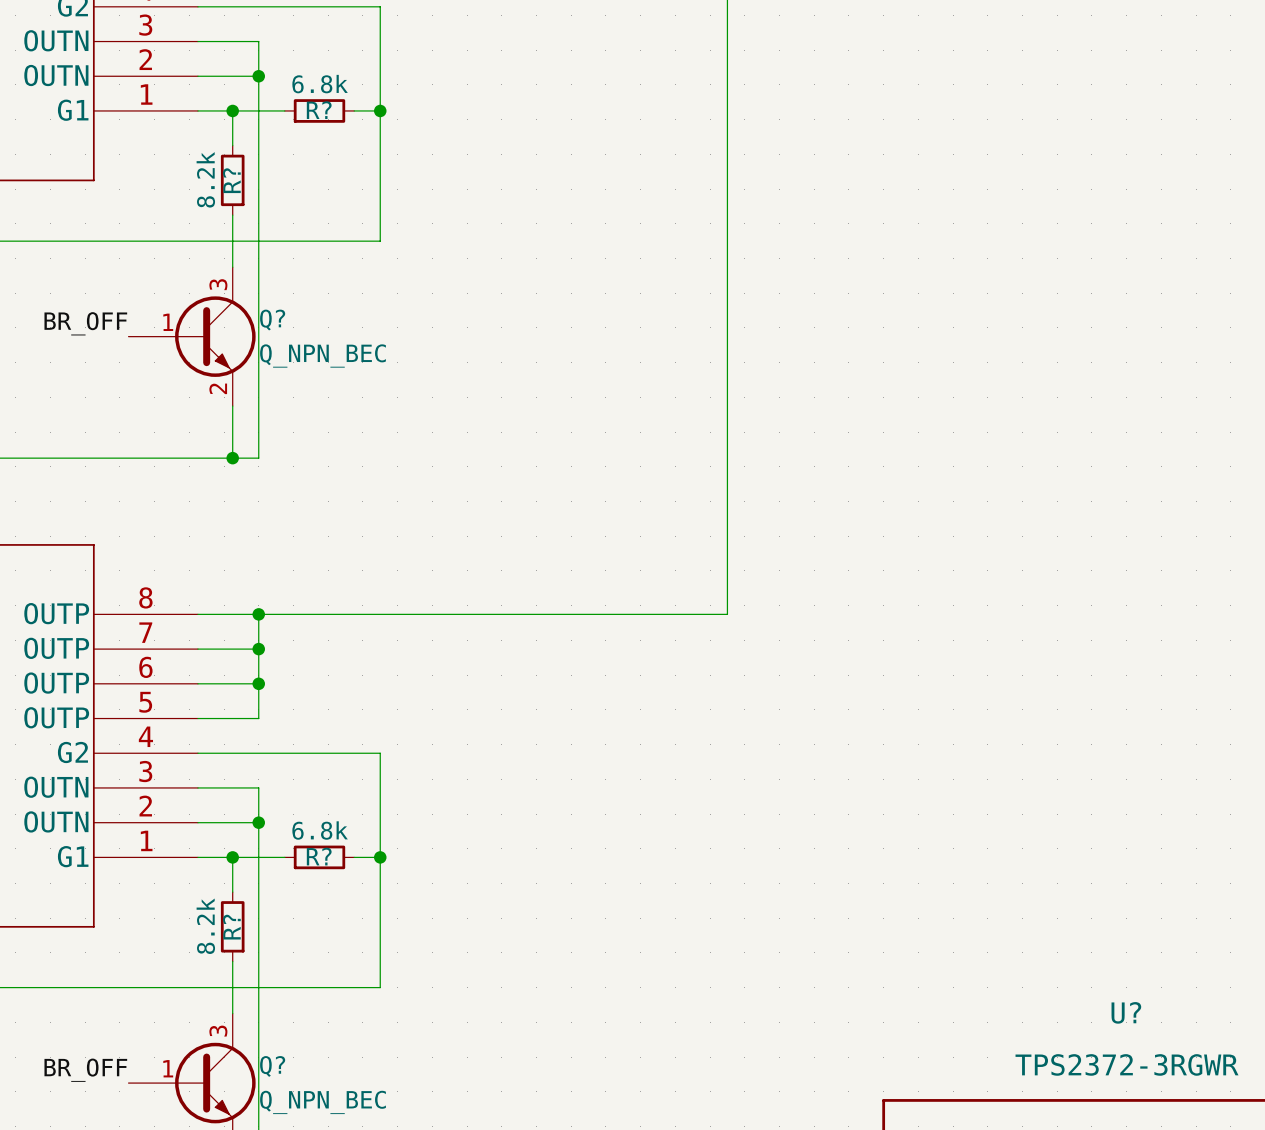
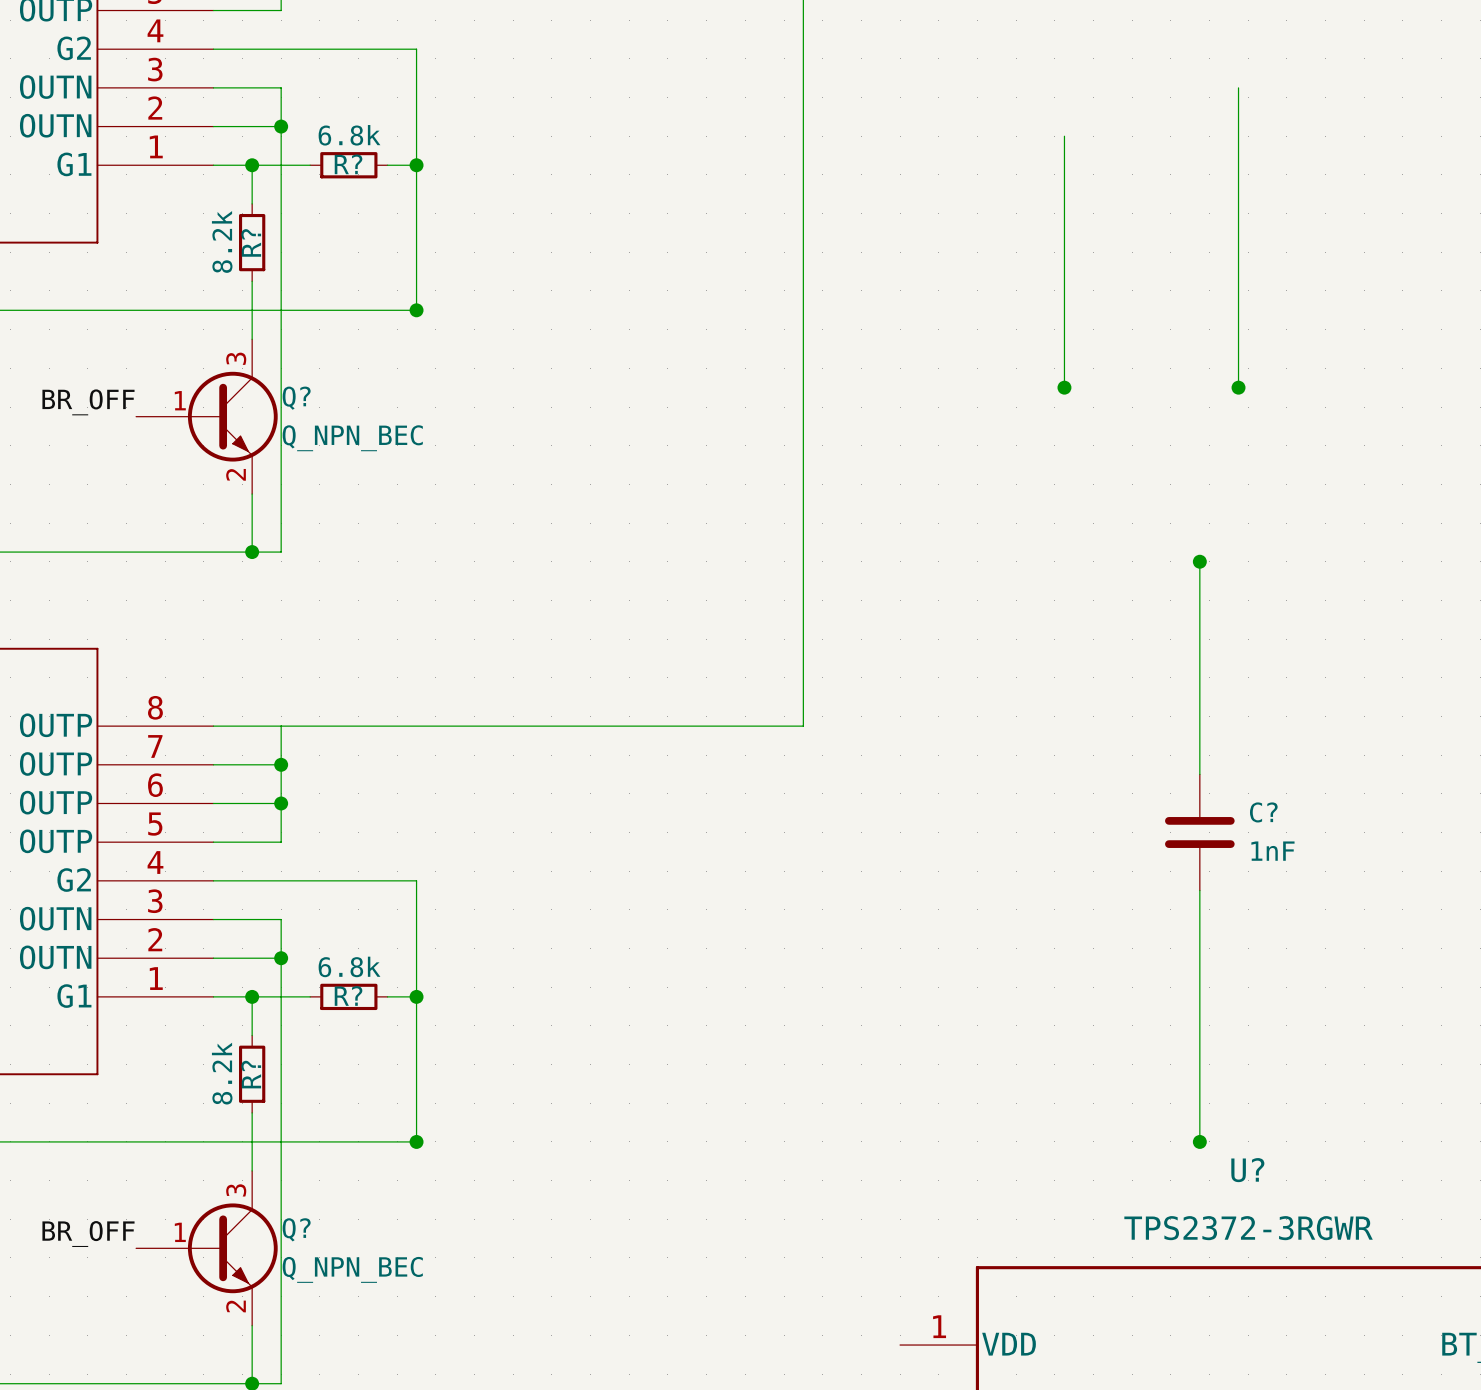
wire: none -> (1238, 87) (1238, 387)
wire: none -> (1064, 136) (1064, 387)
junction: none -> (416, 310)
junction: none -> (1064, 387)
junction: none -> (1238, 387)
wire: none -> (1199, 561) (1199, 774)
junction: none -> (1199, 561)
junction: (258, 614) -> none
C?: none -> 1nF (1199, 832)
wire: none -> (1199, 890) (1199, 1141)
junction: none -> (416, 1141)
junction: none -> (1199, 1141)

